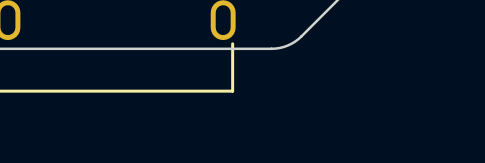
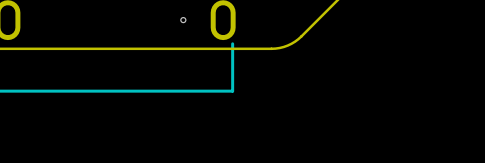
via: none -> (183, 20)

